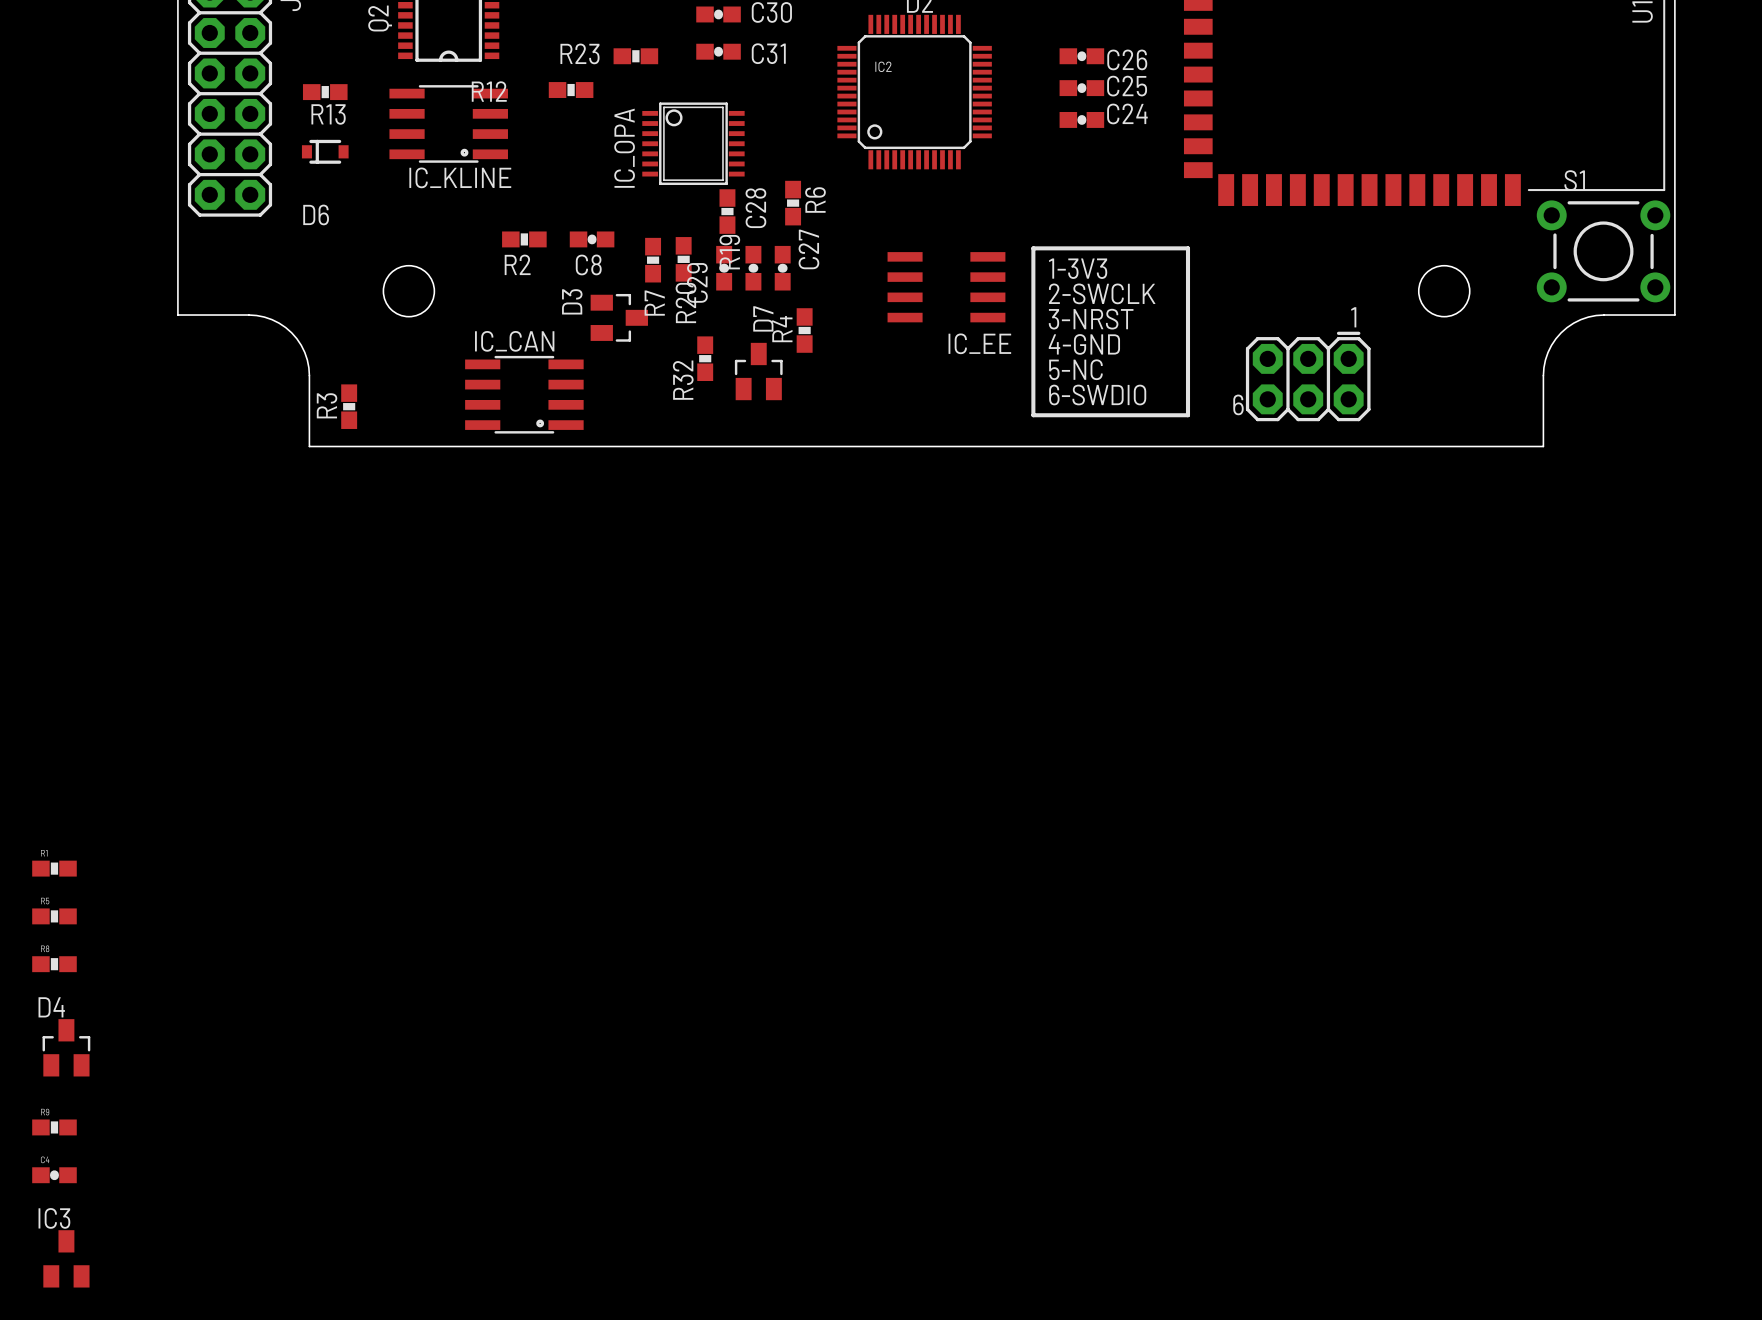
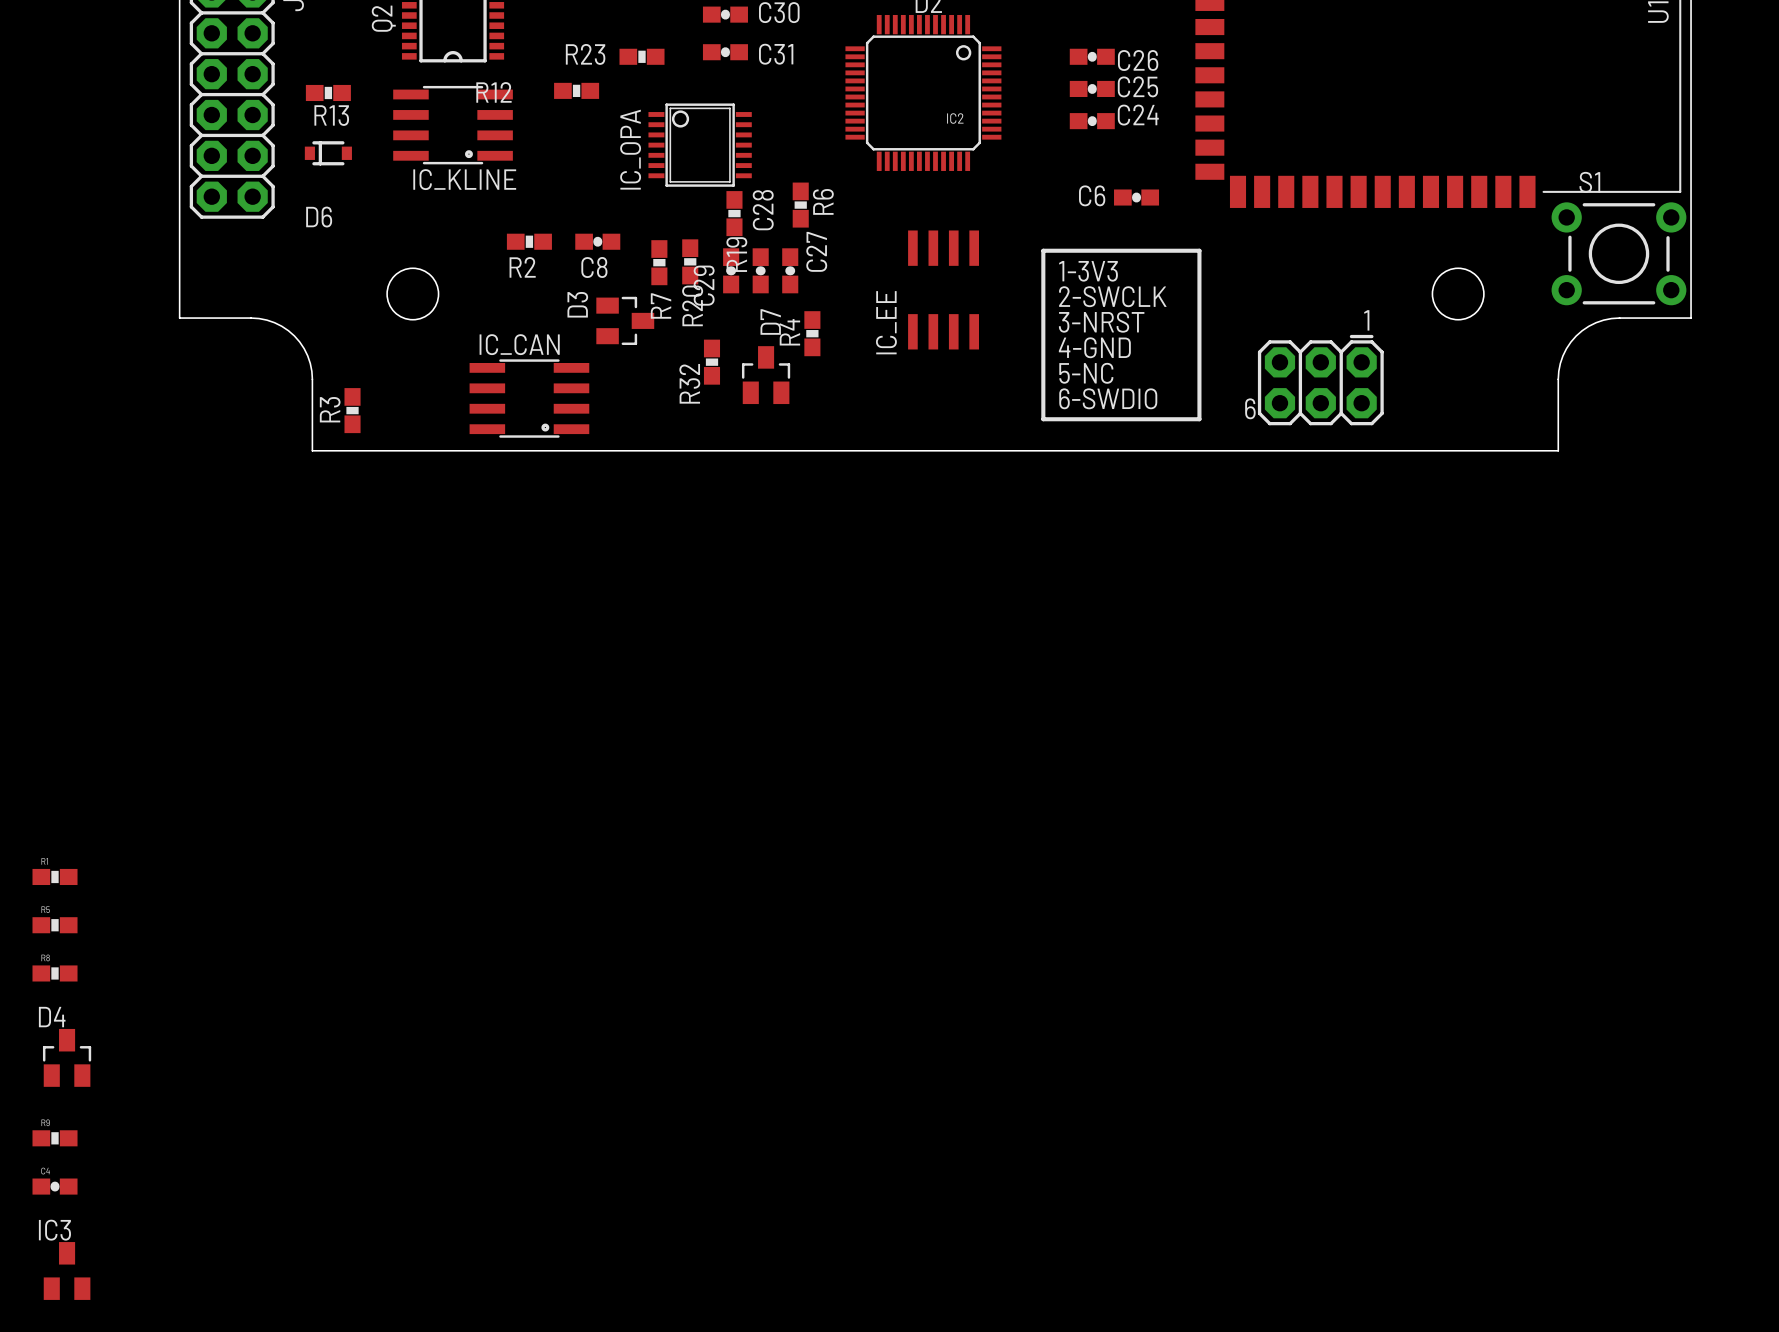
IC2 rotation: 0° (914, 92) -> 180° (923, 92)
C6: none -> (1136, 197)
IC_EE rotation: 0° (946, 287) -> 90° clockwise (943, 289)

